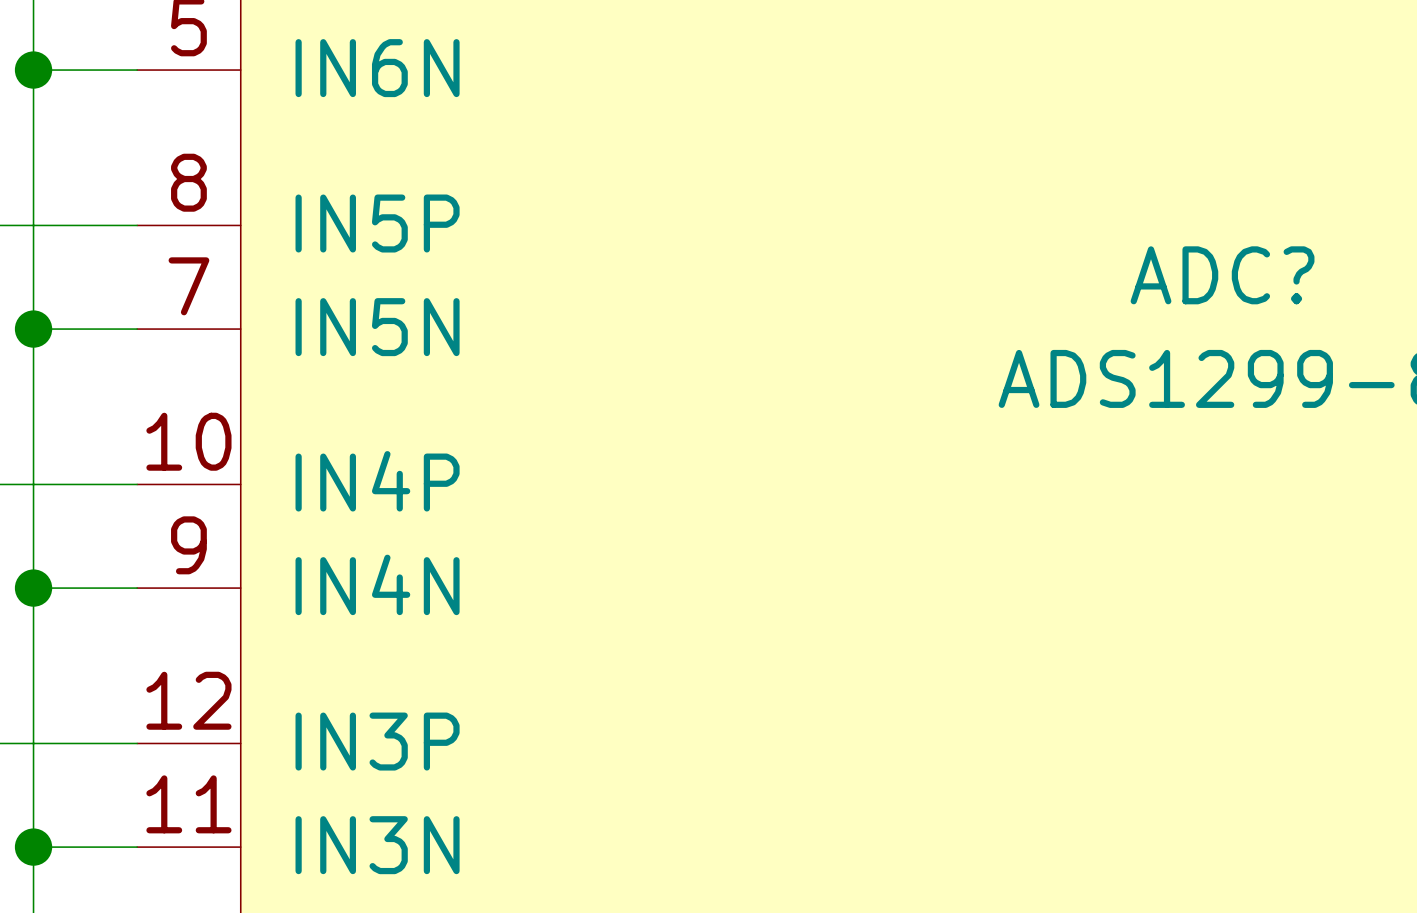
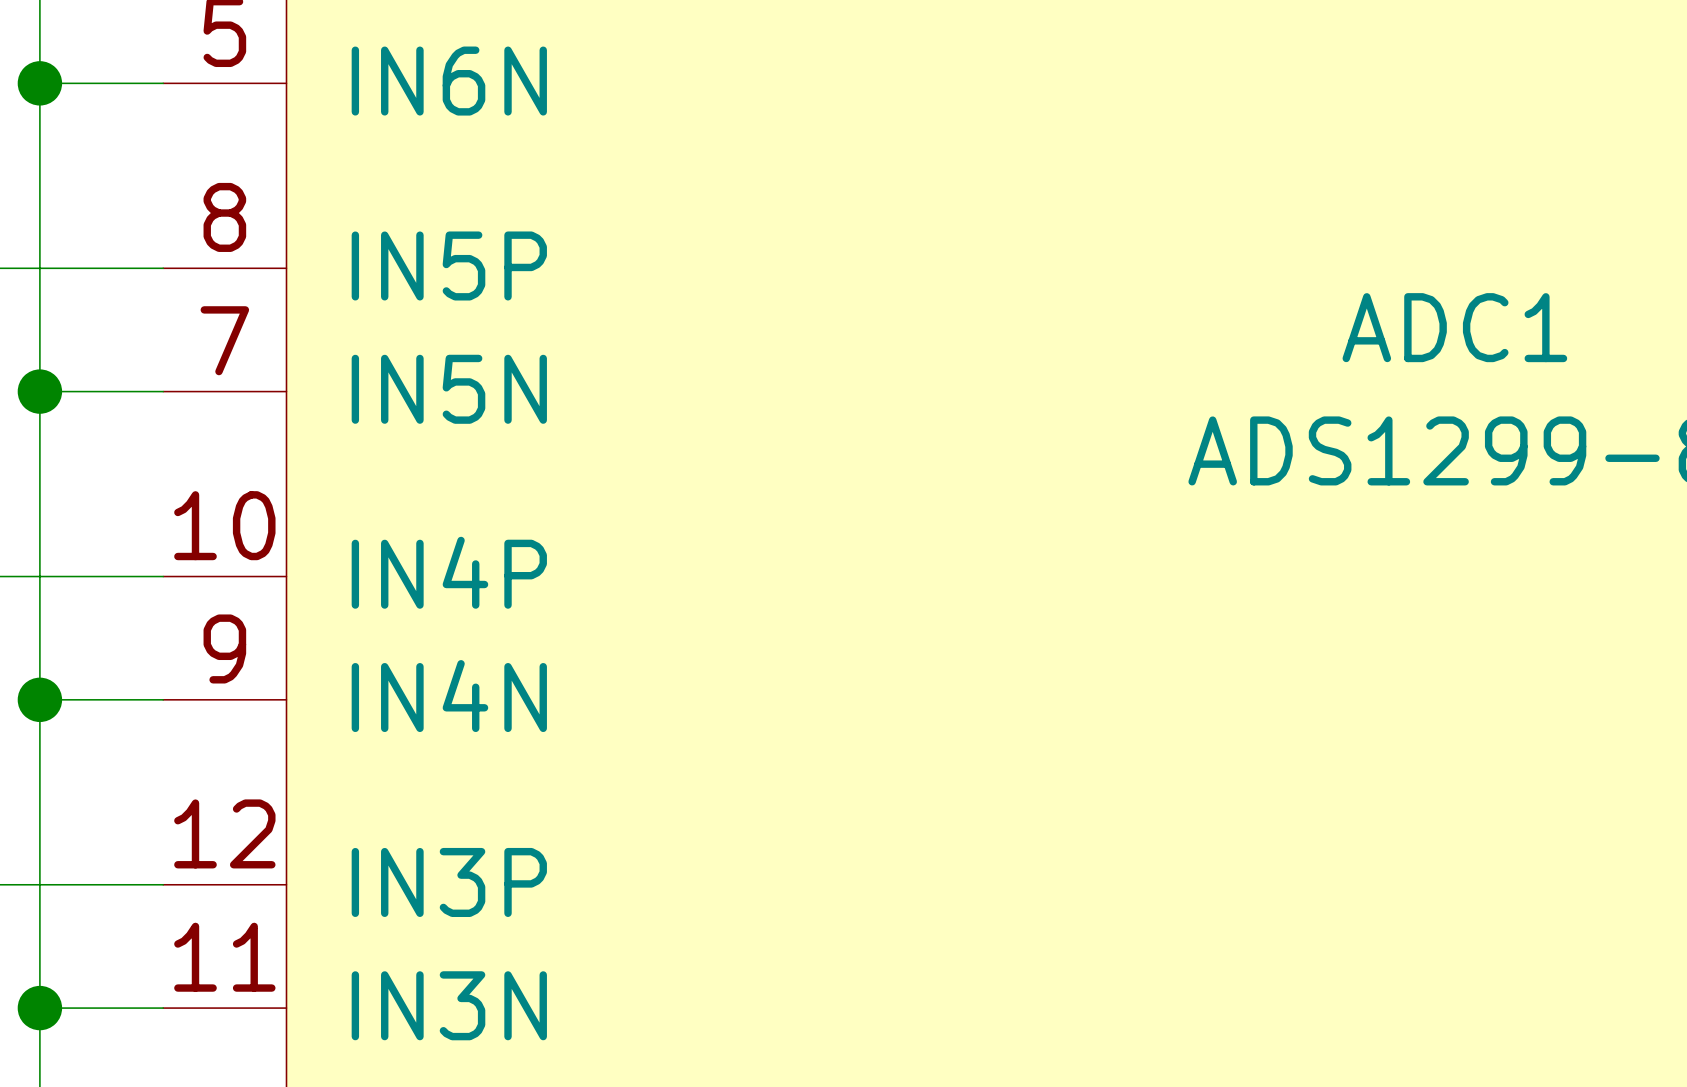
ADC? name: ADC? (1222, 275) -> ADC1 (1454, 327)

